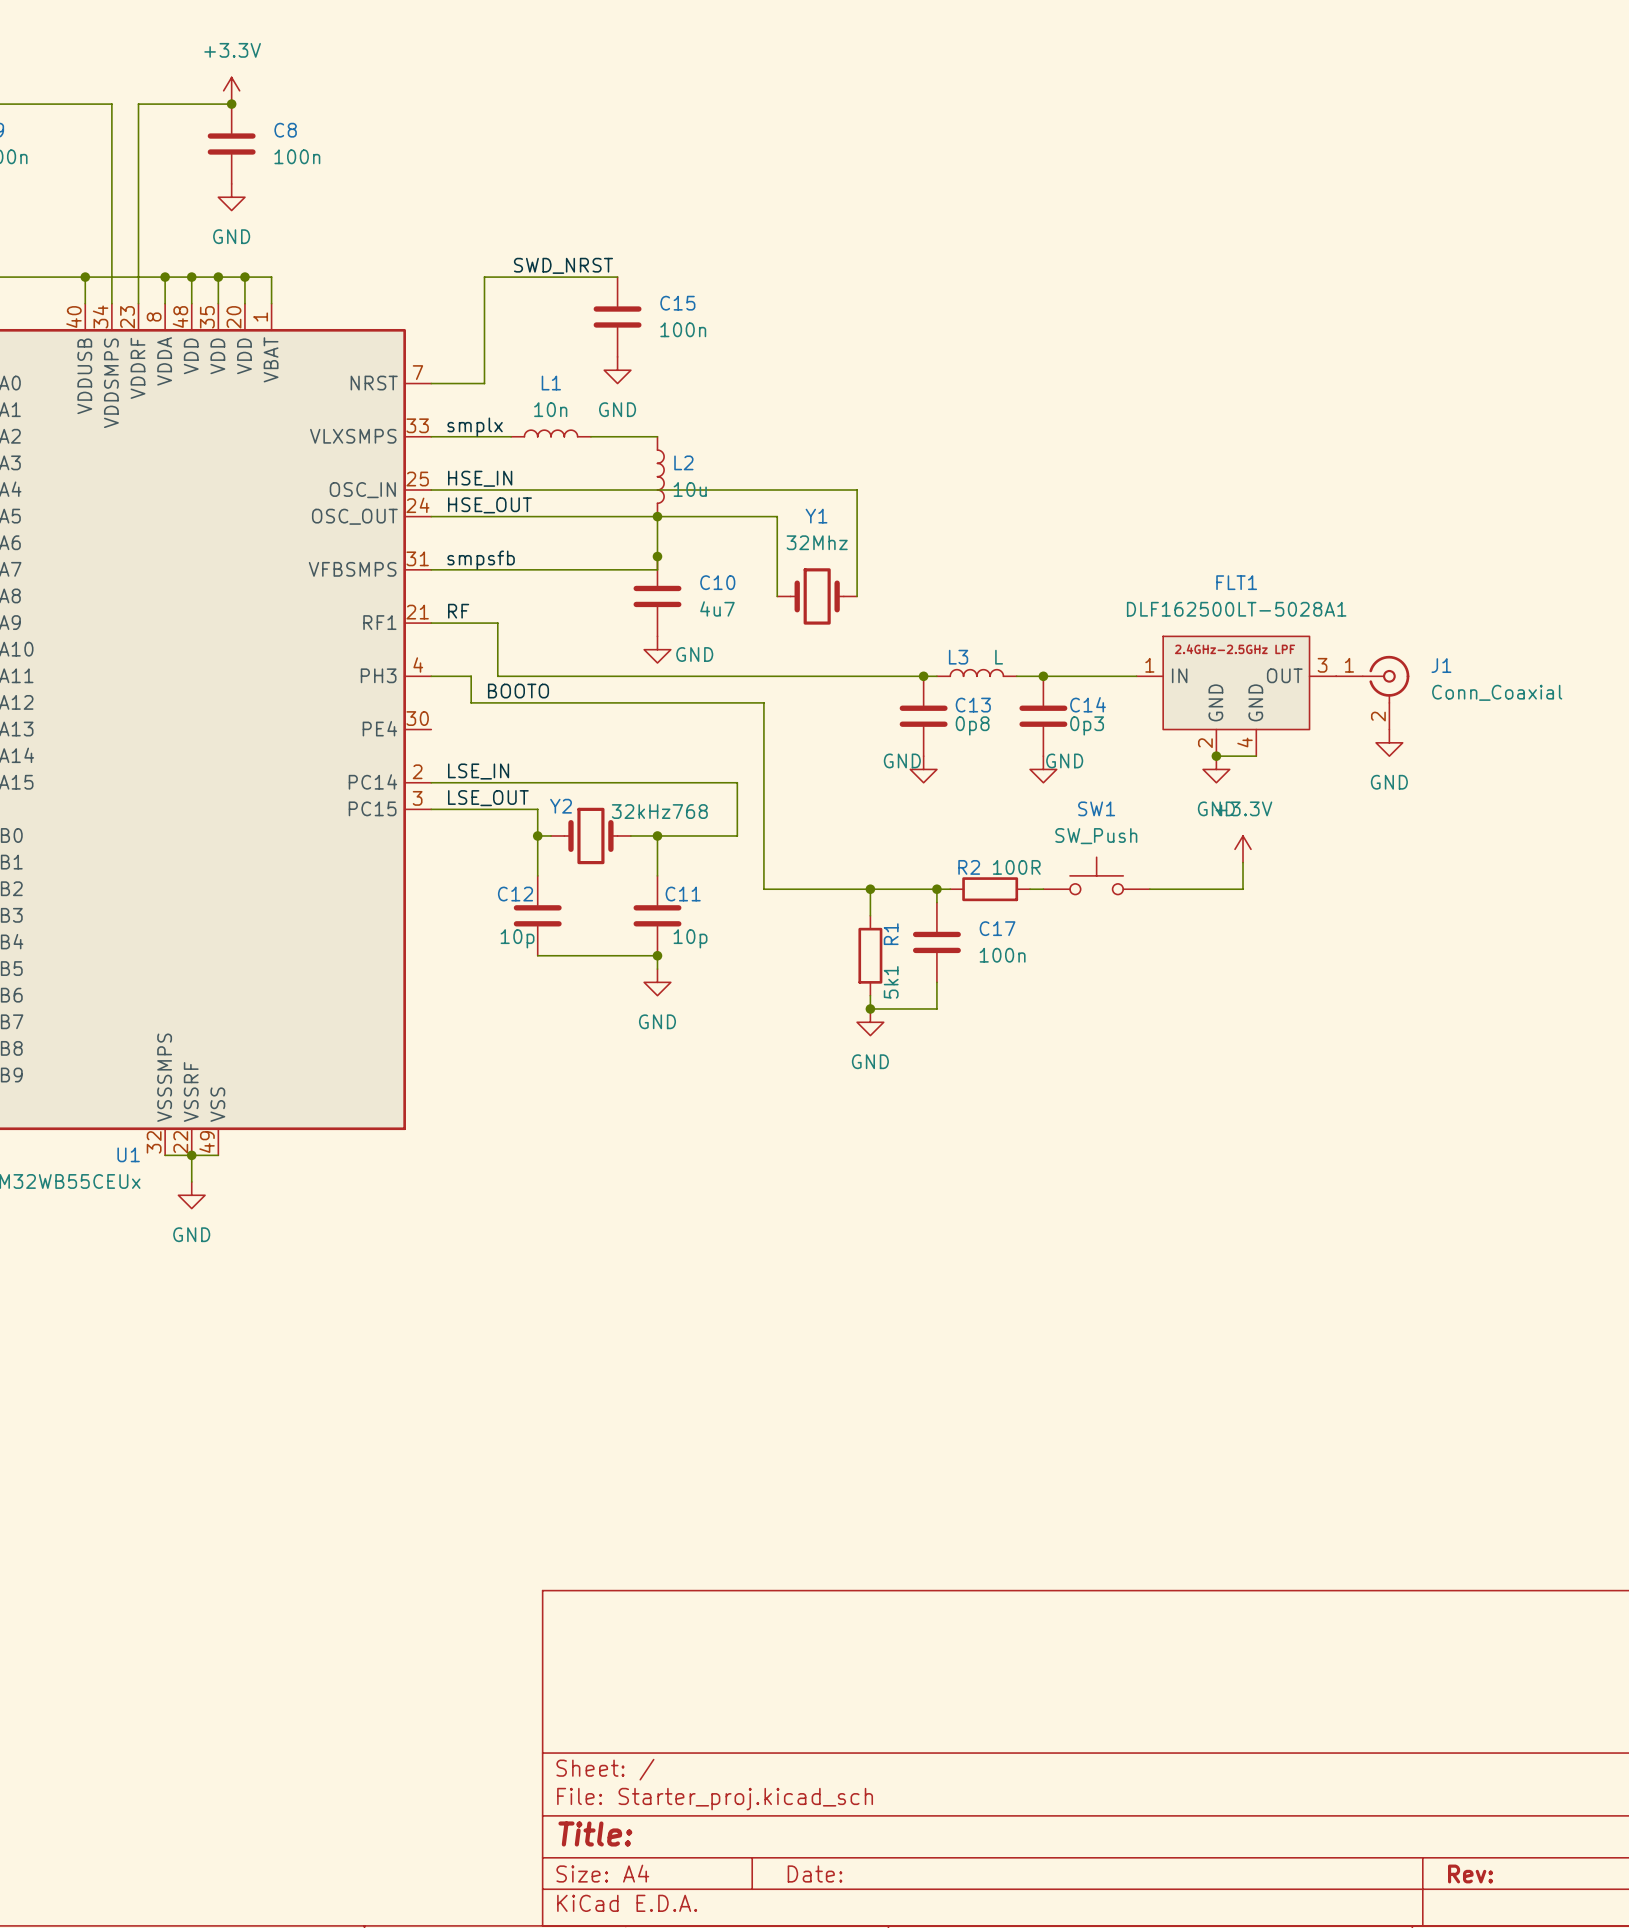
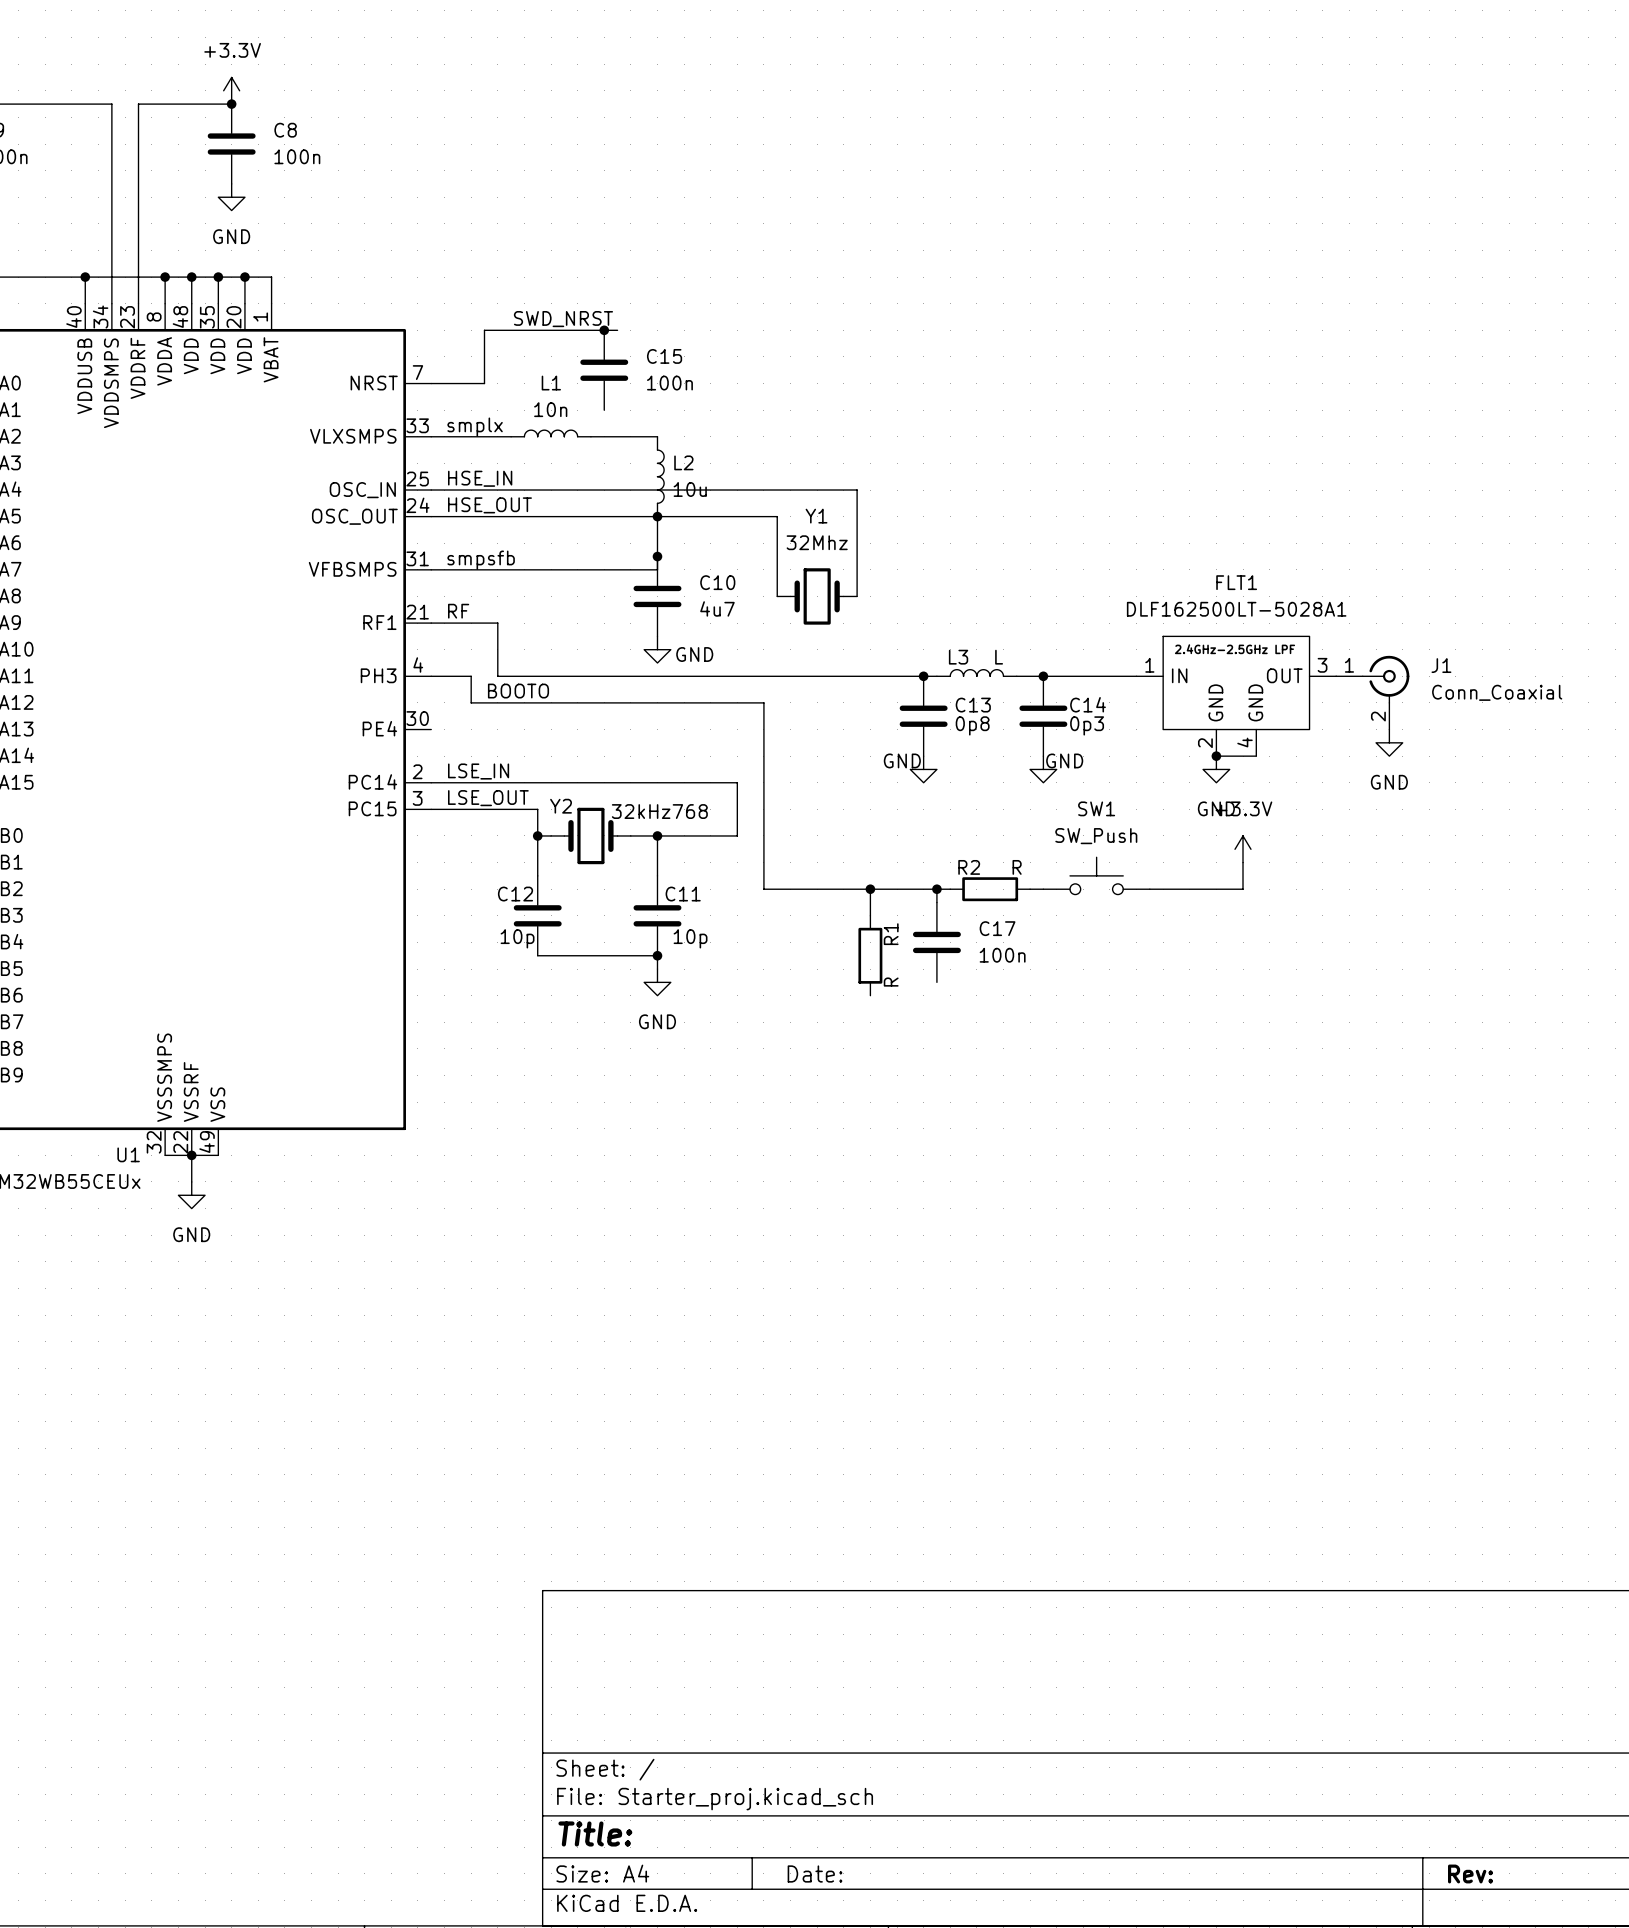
label position: SWD_NRST (563, 265) -> SWD_NRST (563, 319)
wire: (617, 277) (484, 277) (484, 330) -> (617, 330) (484, 330)
C15 position: (617, 317) -> (604, 370)
junction: none -> (604, 330)
power symbol: GND (617, 370) -> none
R2 value: 100R (1016, 867) -> R (1017, 867)
R1 value: 5k1 (891, 982) -> R (891, 982)
wire: (936, 982) (936, 1008) (870, 1008) (870, 995) -> none
junction: (870, 1008) -> none
power symbol: GND (870, 1022) -> none

